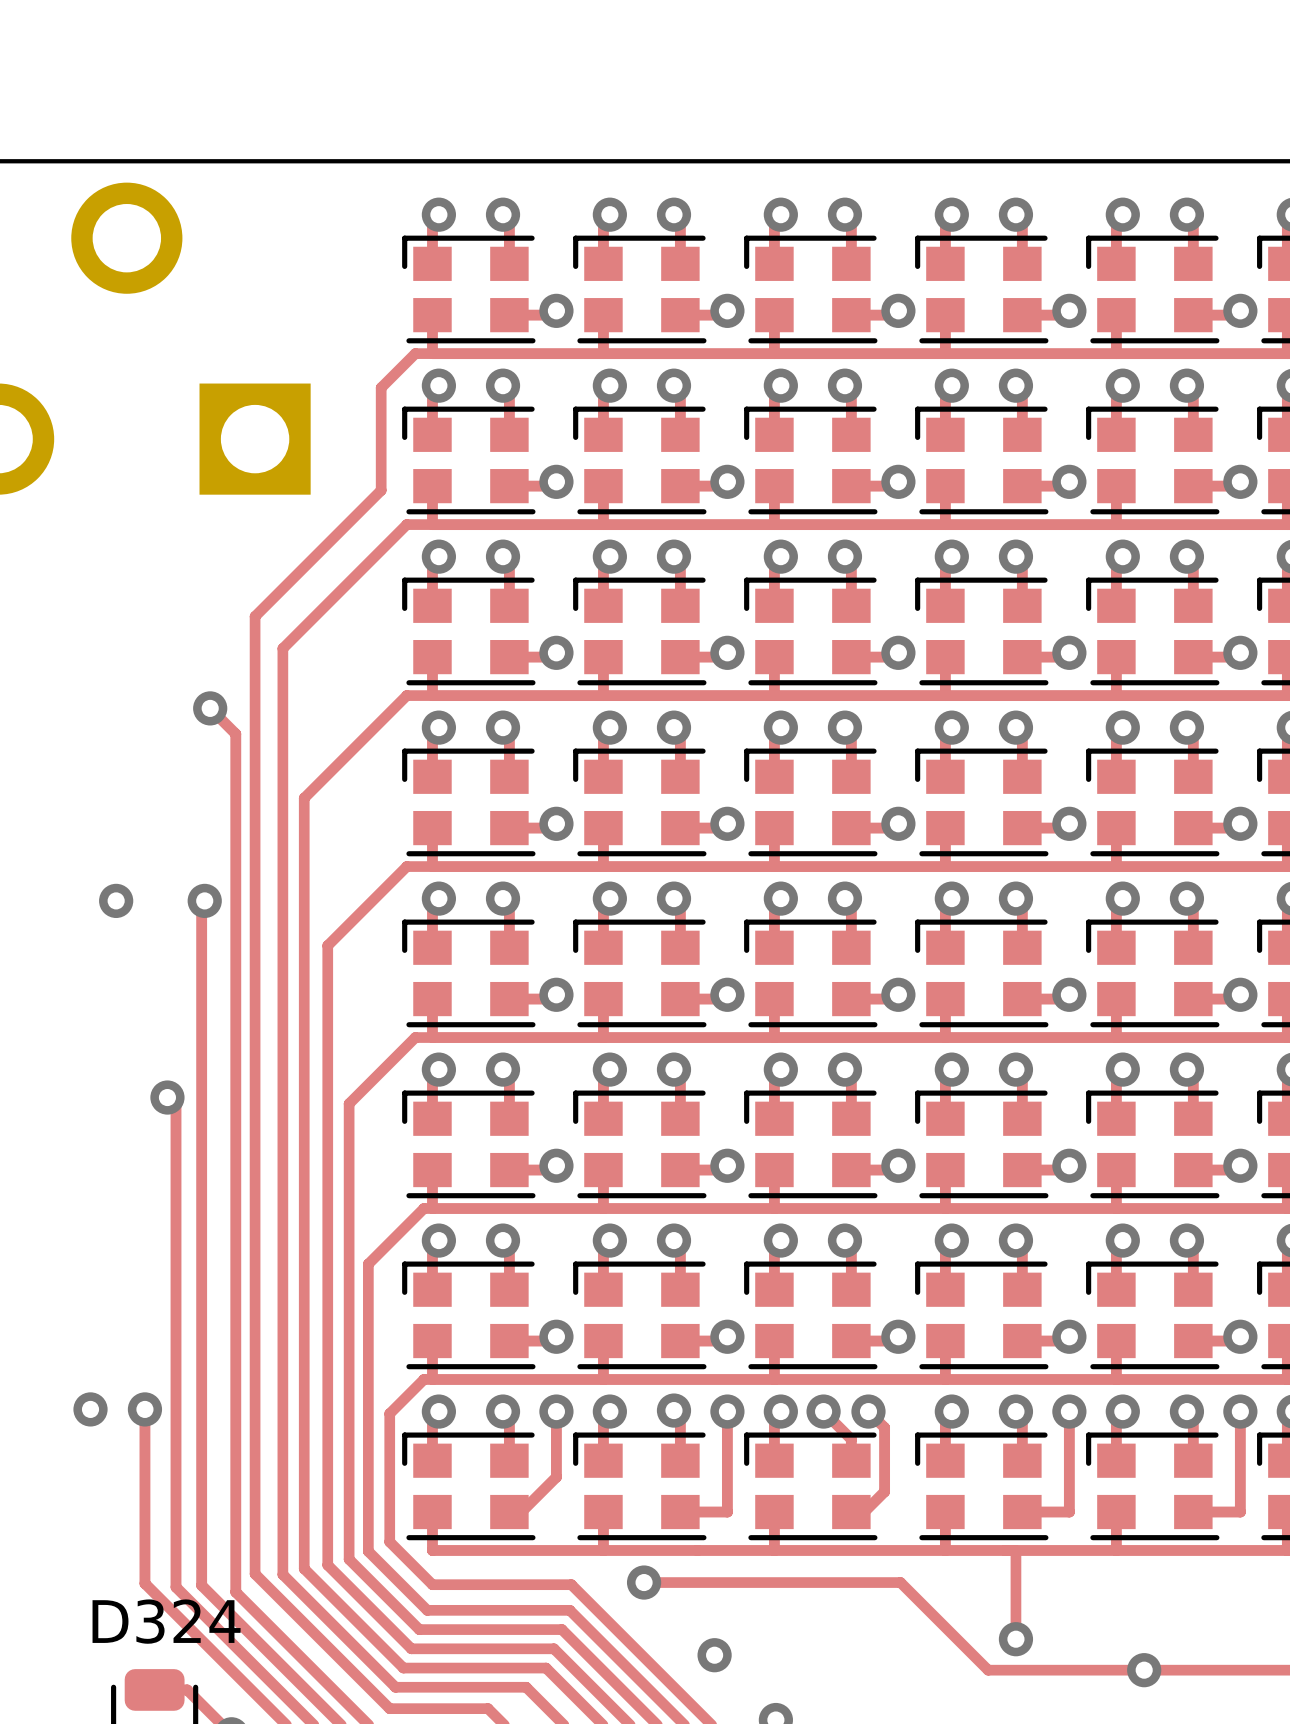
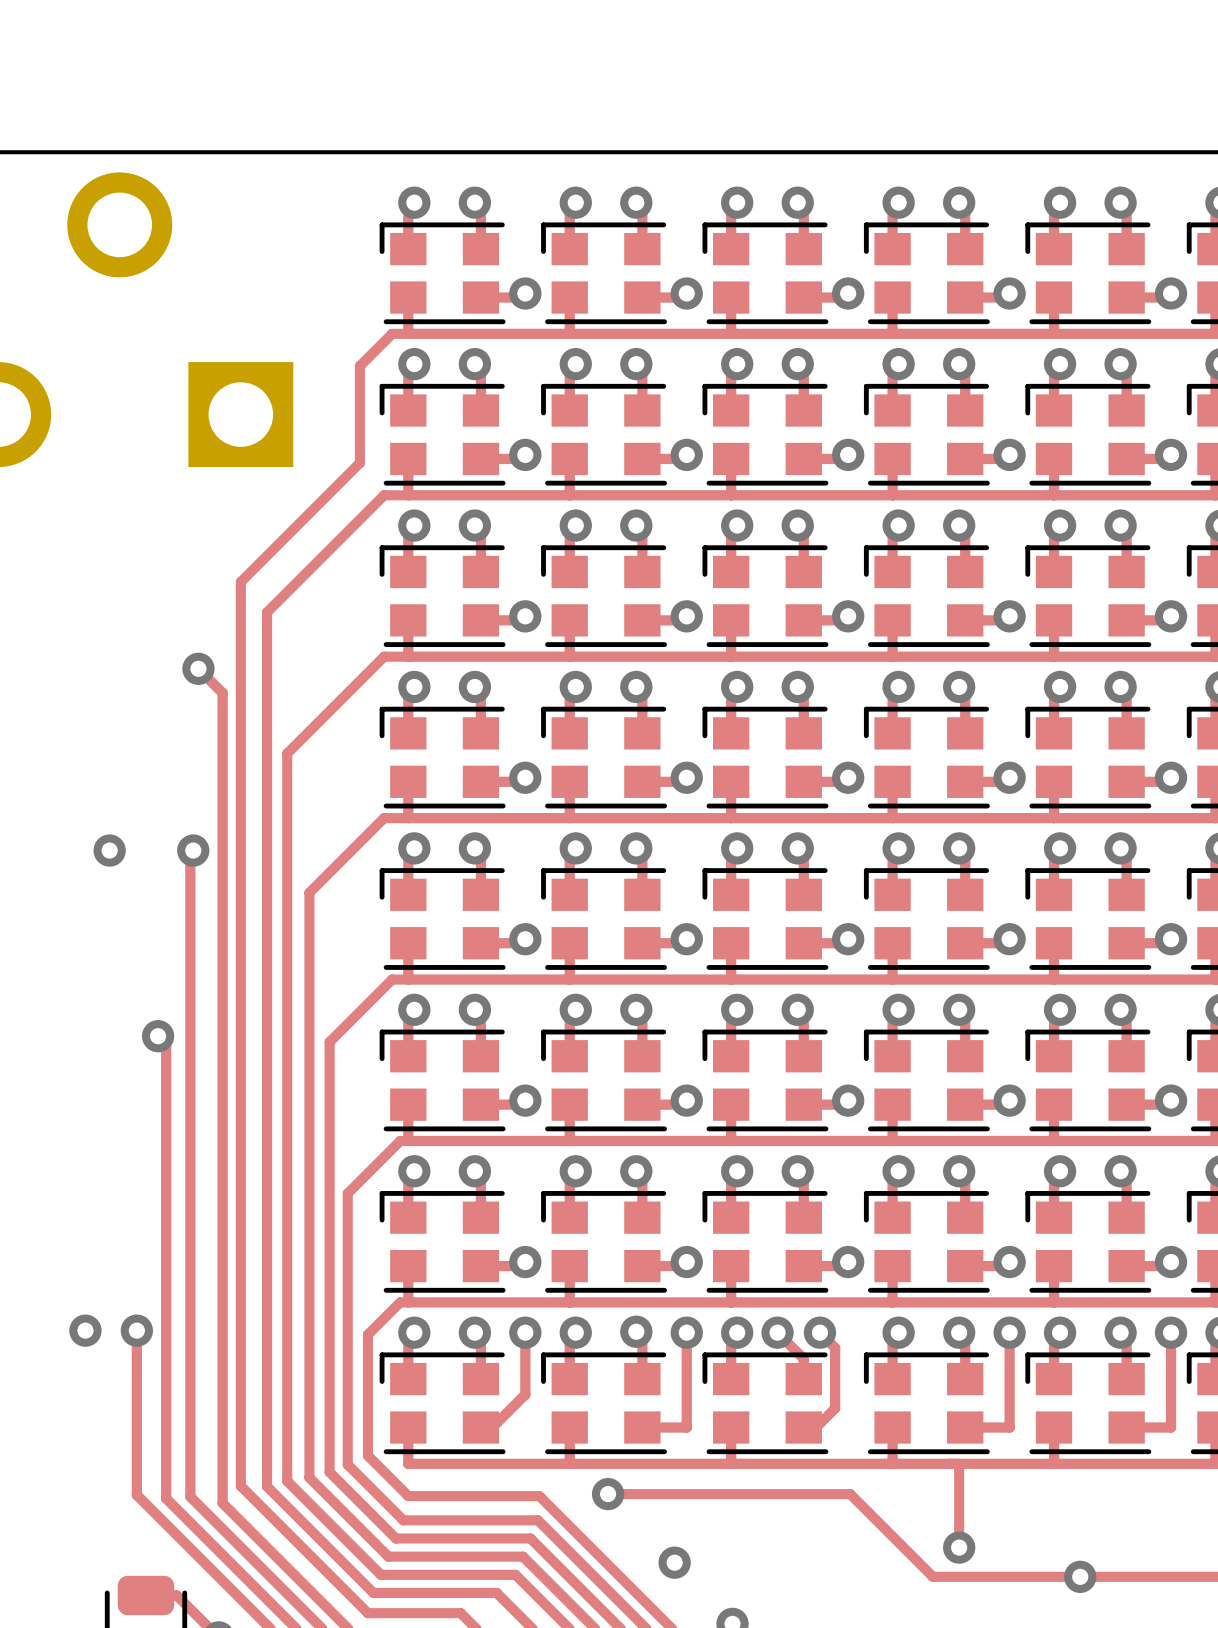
D324 name: D324 (166, 1621) -> none

